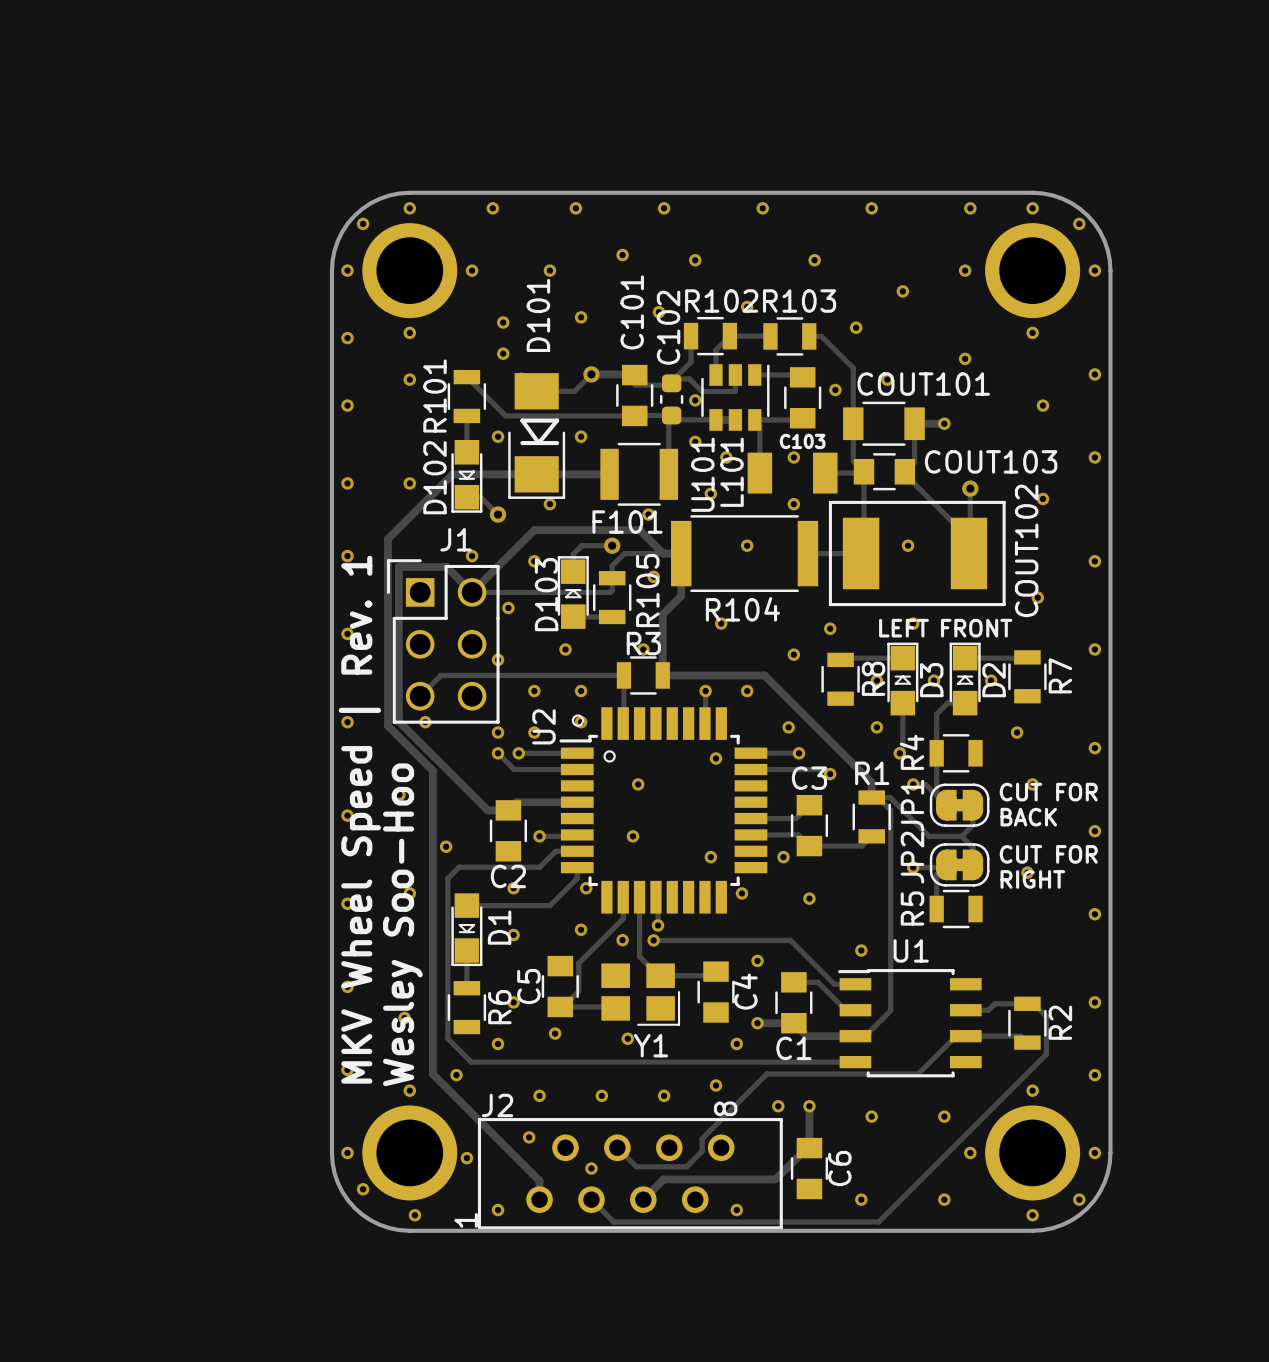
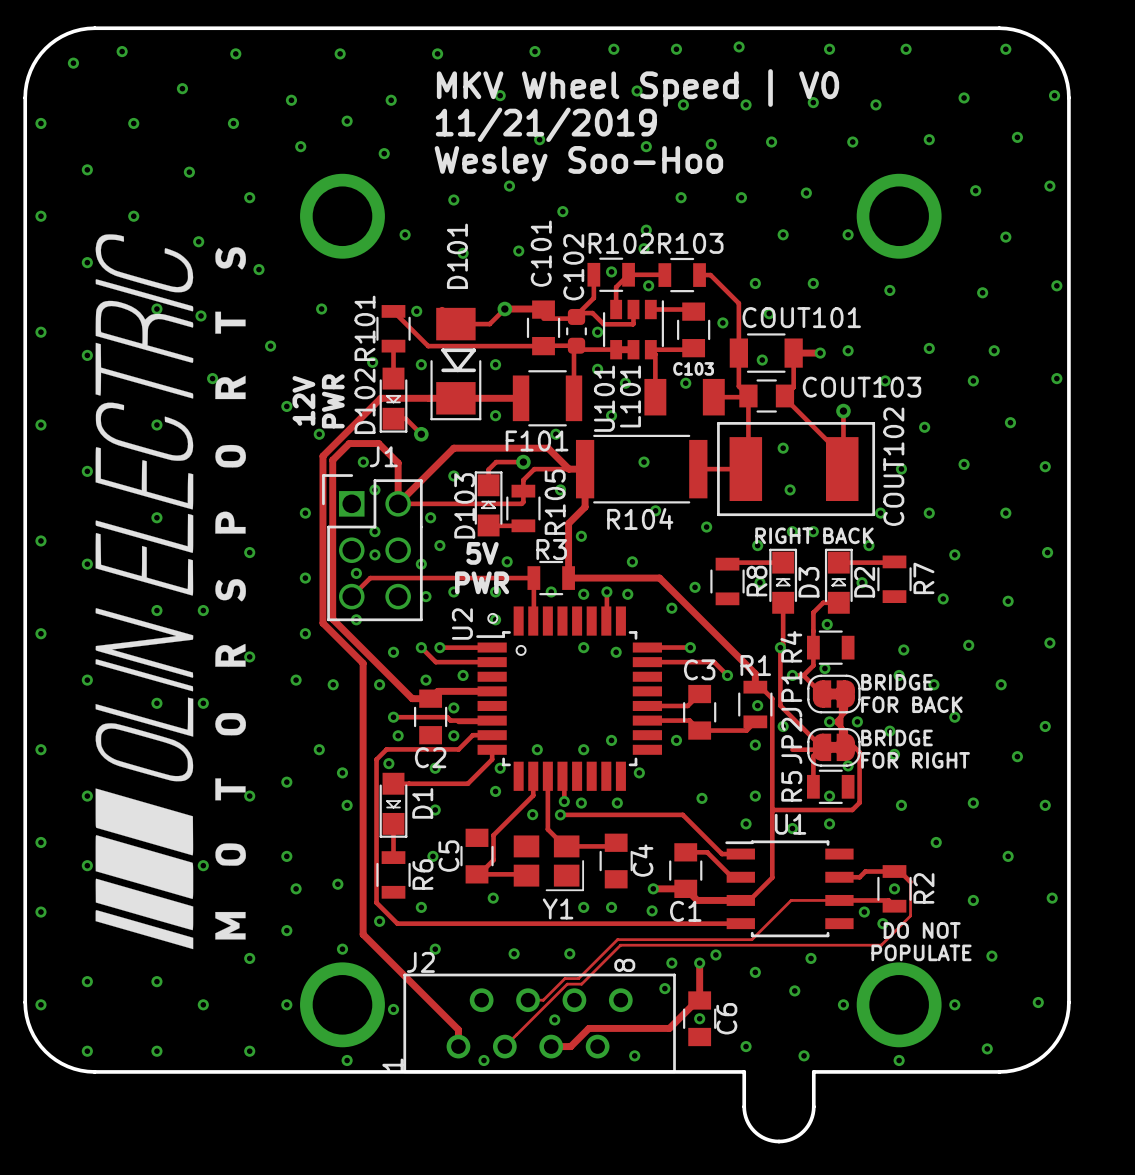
via: none -> (739, 46)
via: none -> (613, 49)
via: none -> (676, 49)
via: none -> (829, 49)
via: none -> (906, 49)
via: none -> (1005, 49)
via: none -> (122, 51)
via: none -> (534, 51)
via: none -> (235, 53)
via: none -> (340, 53)
via: none -> (437, 53)
via: none -> (73, 63)
via: none -> (182, 88)
text: none -> MKV Wheel Speed | V0 (638, 88)
via: none -> (637, 90)
via: none -> (500, 95)
via: none -> (1054, 95)
via: none -> (964, 97)
via: none -> (291, 100)
via: none -> (391, 100)
via: none -> (813, 102)
via: none -> (683, 104)
via: none -> (746, 104)
via: none -> (875, 104)
via: none -> (347, 121)
via: none -> (40, 123)
via: none -> (133, 123)
via: none -> (233, 123)
text: none -> 11/21/2019 (546, 124)
via: none -> (1017, 137)
via: none -> (539, 139)
via: none -> (929, 139)
via: none -> (771, 142)
via: none -> (711, 144)
via: none -> (300, 146)
board edge: (409, 192) (1032, 192) (1052, 195) (1071, 203) (1087, 215) (1100, 231) (1107, 250) (1110, 270) (1110, 1152) (1107, 1173) (1100, 1191) (1087, 1208) (1071, 1220) (1052, 1228) (1032, 1230) (409, 1230) (389, 1228) (370, 1220) (354, 1208) (342, 1191) (334, 1173) (331, 1152) (332, 260) (337, 240) (354, 215) (380, 198) (409, 192) -> none
via: none -> (384, 153)
via: (409, 208) -> none
via: (492, 208) -> none
via: (575, 208) -> none
via: (664, 208) -> none
via position: (762, 208) -> (646, 146)
via: (871, 208) -> none
via position: (970, 208) -> (852, 142)
via: (1032, 208) -> none
text: none -> Wesley Soo-Hoo (578, 163)
via: none -> (87, 169)
via: none -> (189, 172)
via: (363, 223) -> none
via: (1079, 223) -> none
via: none -> (509, 186)
via: none -> (1049, 186)
via: none -> (975, 190)
via: none -> (806, 193)
via: none -> (249, 197)
via: none -> (681, 197)
via: none -> (741, 197)
via: none -> (453, 200)
via: (622, 255) -> none
via: (695, 260) -> none
via: (814, 260) -> none
via: none -> (562, 211)
via: none -> (40, 216)
via: none -> (133, 216)
via: (347, 270) -> none
via: (472, 270) -> none
via: (549, 270) -> none
via: (965, 270) -> none
via: (1094, 270) -> none
via: none -> (646, 230)
drawing: none -> [95, 234, 246, 950]
via: none -> (405, 234)
via: none -> (848, 234)
via: none -> (1005, 237)
via: none -> (198, 241)
via: none -> (518, 251)
via: none -> (463, 253)
via: (658, 312) -> none
via: (581, 317) -> none
via: none -> (87, 262)
via: (503, 322) -> none
via position: (856, 327) -> (755, 283)
via: none -> (258, 269)
via: (409, 332) -> none
via: none -> (611, 271)
via position: (1032, 332) -> (889, 290)
via: (347, 338) -> none
via: none -> (813, 283)
via: none -> (648, 285)
via: none -> (1056, 285)
via position: (503, 353) -> (416, 311)
via: none -> (982, 292)
via: (965, 358) -> none
via: none -> (156, 309)
via: none -> (321, 309)
via: (1094, 374) -> none
via: (409, 379) -> none
via: none -> (201, 315)
via: none -> (40, 332)
via position: (347, 405) -> (270, 346)
via: (1043, 405) -> none
via: none -> (929, 348)
via: none -> (848, 350)
via: none -> (994, 350)
via: none -> (87, 355)
via: none -> (762, 360)
via: none -> (372, 362)
via: none -> (212, 378)
via: none -> (1056, 378)
via: none -> (885, 380)
via position: (1094, 457) -> (973, 380)
text: none -> 12V (303, 400)
text: none -> PWR (333, 401)
via: (409, 483) -> none
via position: (1043, 498) -> (924, 427)
via: none -> (1010, 422)
via: none -> (40, 424)
via: none -> (156, 424)
via position: (549, 504) -> (495, 415)
via: (793, 504) -> none
via: none -> (319, 434)
via: none -> (783, 448)
via: none -> (363, 462)
via: (908, 545) -> none
via: none -> (1045, 466)
via: none -> (901, 469)
via: none -> (87, 471)
via: (347, 556) -> none
via: (472, 556) -> none
via position: (1094, 561) -> (964, 464)
track: (398, 567) (446, 567) (472, 592) -> (332, 481) (332, 460) (349, 443) (378, 443) (398, 463) (398, 503)
via: none -> (374, 489)
via: none -> (790, 489)
via: (1037, 597) -> none
via: none -> (655, 510)
via: none -> (305, 513)
via: none -> (880, 513)
via: none -> (929, 513)
via: none -> (1005, 513)
via: none -> (156, 517)
via: none -> (374, 531)
via: (721, 623) -> none
via: none -> (813, 531)
via: none -> (581, 536)
via position: (830, 628) -> (706, 527)
text: LEFT (903, 628) -> RIGHT (784, 535)
text: FRONT (976, 628) -> BACK (848, 535)
via: none -> (40, 540)
via: (347, 633) -> none
via: none -> (439, 545)
via: none -> (757, 545)
via: none -> (868, 545)
via: none -> (249, 552)
via: none -> (1047, 552)
text: none -> 5V (482, 553)
via: none -> (374, 554)
via: (565, 649) -> none
via: (643, 649) -> none
via: (793, 654) -> none
via: none -> (507, 561)
via: none -> (632, 561)
via: none -> (87, 564)
via: none -> (356, 573)
via: none -> (305, 578)
text: none -> PWR (482, 582)
via: (934, 680) -> none
via: none -> (695, 587)
via: none -> (551, 591)
via: (747, 691) -> none
via: none -> (583, 594)
via: none -> (627, 594)
via: none -> (425, 596)
via: none -> (943, 598)
via: none -> (1008, 601)
via: none -> (671, 608)
via: none -> (156, 610)
via: none -> (203, 610)
via: (347, 722) -> none
via: (788, 727) -> none
via: (876, 727) -> none
via: none -> (827, 624)
via: (498, 732) -> none
via: (534, 732) -> none
via: (1017, 732) -> none
via: none -> (40, 633)
via: none -> (305, 633)
via position: (1094, 748) -> (968, 645)
via: none -> (1049, 643)
via: none -> (583, 647)
track: none -> (780, 647) (780, 705) (822, 747)
via: none -> (903, 649)
via: none -> (393, 652)
via: none -> (249, 656)
track: (936, 773) (936, 795) -> (813, 665) (803, 675)
track: none -> (718, 666) (727, 675)
via position: (830, 774) -> (727, 675)
via: none -> (824, 668)
via: none -> (463, 675)
via: (638, 784) -> none
via: none -> (87, 680)
via: none -> (425, 680)
text: CUT FOR (1048, 792) -> BRIDGE (896, 682)
via: none -> (379, 684)
via: none -> (933, 684)
via: none -> (1001, 684)
track: (878, 797) (890, 797) (929, 836) (961, 836) -> none
track: none -> (841, 694) (841, 744) (852, 745) (859, 752) (859, 802) (852, 810) (772, 810)
via: none -> (156, 703)
via: none -> (203, 703)
via position: (347, 815) -> (296, 680)
text: BACK (1028, 817) -> FOR BACK (911, 704)
via: none -> (757, 705)
text: MKV Wheel Speed | Rev. 1 (359, 819) -> none
via: none -> (453, 707)
track: none -> (393, 717) (447, 717) (450, 720) (492, 720)
via: none -> (393, 717)
via: (539, 836) -> none
via: (632, 836) -> none
via: none -> (829, 721)
via: none -> (857, 721)
via: none -> (783, 726)
via: none -> (1045, 726)
via: (446, 846) -> none
via: none -> (889, 731)
via: none -> (398, 735)
via: none -> (453, 735)
text: CUT FOR (1048, 854) -> BRIDGE (896, 737)
via: none -> (755, 745)
via: none -> (40, 749)
via: none -> (319, 749)
via: none -> (537, 749)
via: none -> (583, 749)
via: (913, 867) -> none
via: none -> (1017, 756)
text: RIGHT (1032, 879) -> FOR RIGHT (915, 760)
via: none -> (388, 763)
via: none -> (848, 765)
via position: (809, 898) -> (701, 798)
via position: (1094, 914) -> (973, 803)
via: none -> (87, 796)
via: none -> (249, 796)
via: none -> (755, 796)
via: none -> (829, 796)
text: Wesley Soo-Hoo (402, 924) -> none
via: none -> (581, 803)
via: none -> (617, 803)
via: none -> (347, 805)
via position: (581, 929) -> (495, 791)
via: none -> (901, 805)
via: none -> (1045, 805)
via: none -> (829, 823)
via: none -> (792, 828)
via: (757, 960) -> none
via: none -> (40, 842)
via: none -> (936, 842)
via: none -> (1008, 856)
via: none -> (87, 865)
via: none -> (203, 865)
via position: (513, 1002) -> (432, 856)
via: (1094, 1002) -> none
track: (1045, 1015) (1046, 1054) (878, 1221) (613, 1221) (591, 1199) -> (910, 882) (910, 915) (881, 945) (620, 945) (581, 984) (567, 984) (504, 1046)
via: none -> (296, 888)
via: none -> (894, 888)
via position: (555, 1033) -> (493, 898)
via: none -> (1052, 898)
track: (956, 1036) (918, 1073) (766, 1073) (702, 1138) (702, 1151) (686, 1166) (636, 1166) (617, 1147) -> (830, 900) (791, 900) (751, 939) (617, 939) (578, 978) (564, 978) (543, 1000) (528, 1000)
via: none -> (973, 900)
via: (627, 1038) -> none
via: none -> (583, 907)
via: none -> (611, 907)
via: (736, 1043) -> none
via: none -> (652, 910)
via: none -> (40, 912)
via: none -> (864, 912)
via: none -> (882, 923)
text: none -> DO NOT (922, 930)
via position: (456, 1075) -> (379, 921)
via: (1094, 1075) -> none
via: (716, 1085) -> none
via: none -> (435, 949)
via: (1032, 1090) -> none
text: none -> POPULATE (921, 952)
via: (539, 1095) -> none
via: none -> (715, 954)
via: none -> (991, 956)
via: none -> (249, 958)
via: none -> (811, 958)
via: (944, 1116) -> none
via: none -> (87, 981)
via: none -> (156, 981)
via: none -> (664, 988)
via: (529, 1137) -> none
via: none -> (794, 990)
board edge: none -> (25, 1002) (25, 97) (30, 70) (45, 48) (67, 33) (94, 28) (1006, 28) (1026, 33) (1048, 48) (1063, 70) (1068, 90) (1068, 1002) (1063, 1029) (1048, 1051) (1026, 1066) (999, 1071)
board edge: none -> (25, 1002) (28, 1023) (41, 1046) (61, 1063) (87, 1071) (744, 1071)
via: none -> (1038, 1002)
via: none -> (40, 1004)
via: none -> (203, 1004)
via: (591, 1168) -> none
via: none -> (699, 1018)
via: none -> (554, 1019)
track: (685, 1179) (663, 1179) (643, 1199) -> (588, 1028) (570, 1046) (551, 1046)
via: (363, 1189) -> none
via position: (944, 1199) -> (804, 1055)
via position: (1079, 1199) -> (987, 1048)
via: none -> (87, 1051)
via: none -> (156, 1051)
via: none -> (249, 1051)
via: (498, 1210) -> none
via: none -> (483, 1060)
board edge: none -> (744, 1071) (744, 1110) (748, 1123) (762, 1137) (779, 1141) (795, 1137) (809, 1123) (813, 1110) (813, 1071) (999, 1071)

